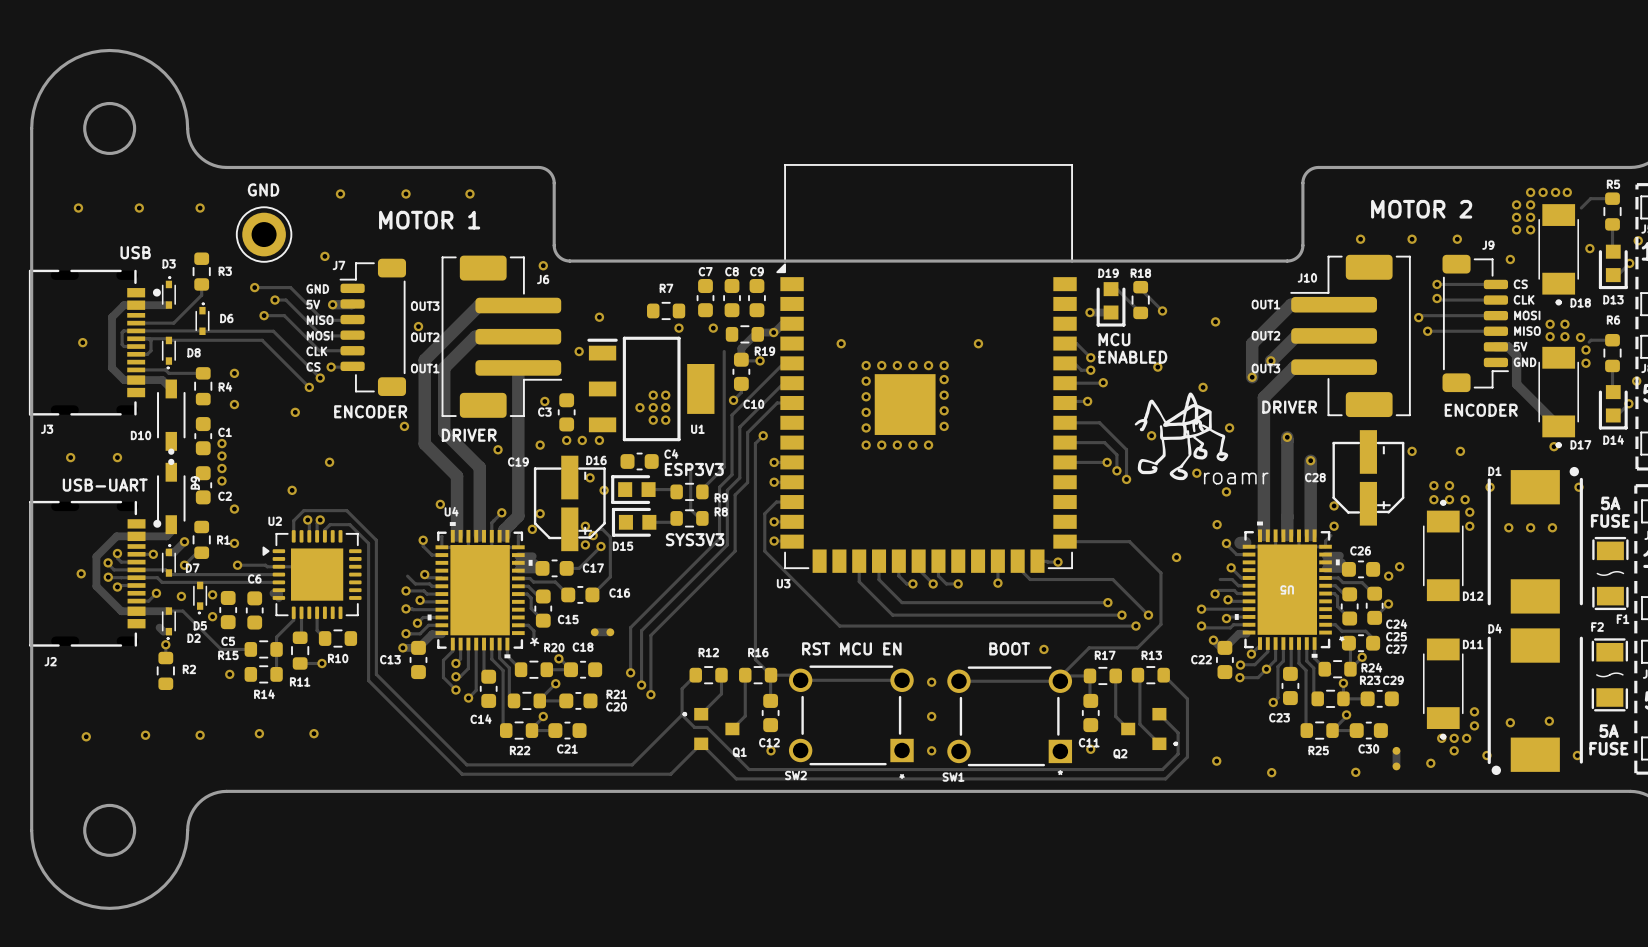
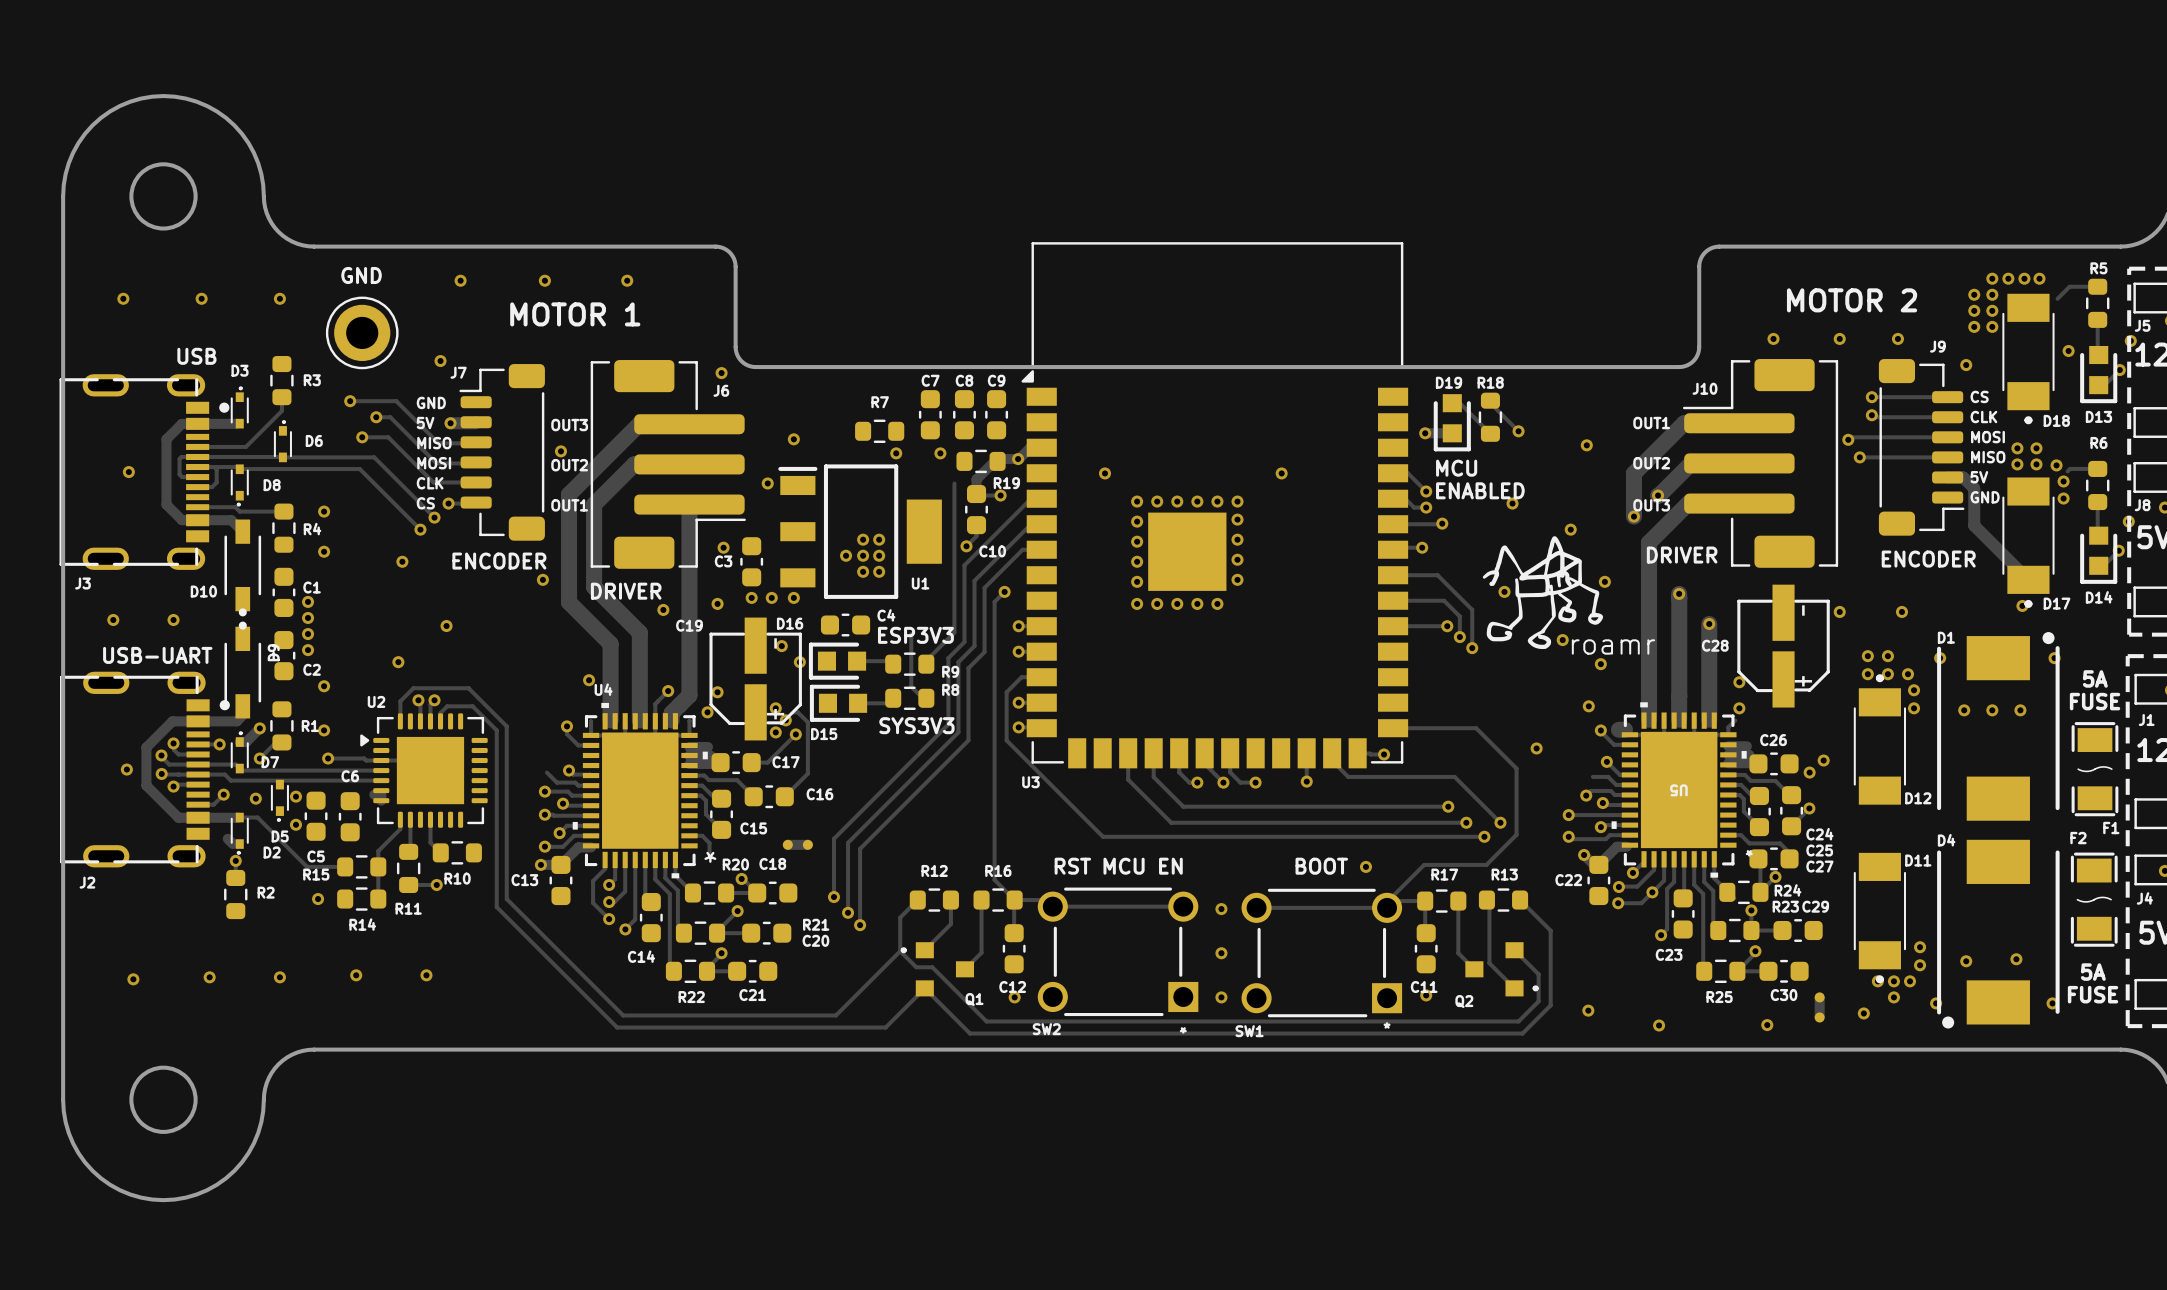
J3 footprint: [28, 269, 161, 416] -> [59, 374, 230, 570]
J2 footprint: [29, 500, 162, 647] -> [60, 671, 230, 868]

